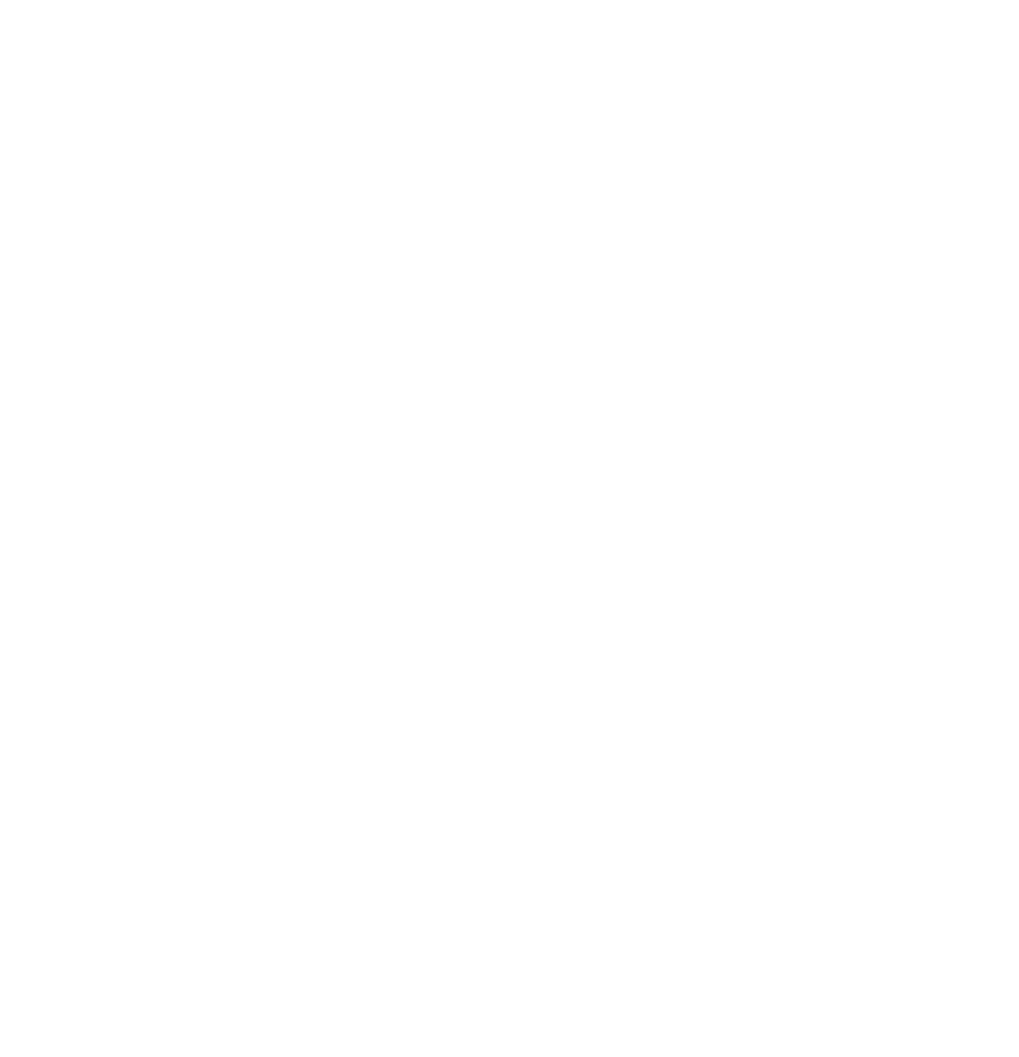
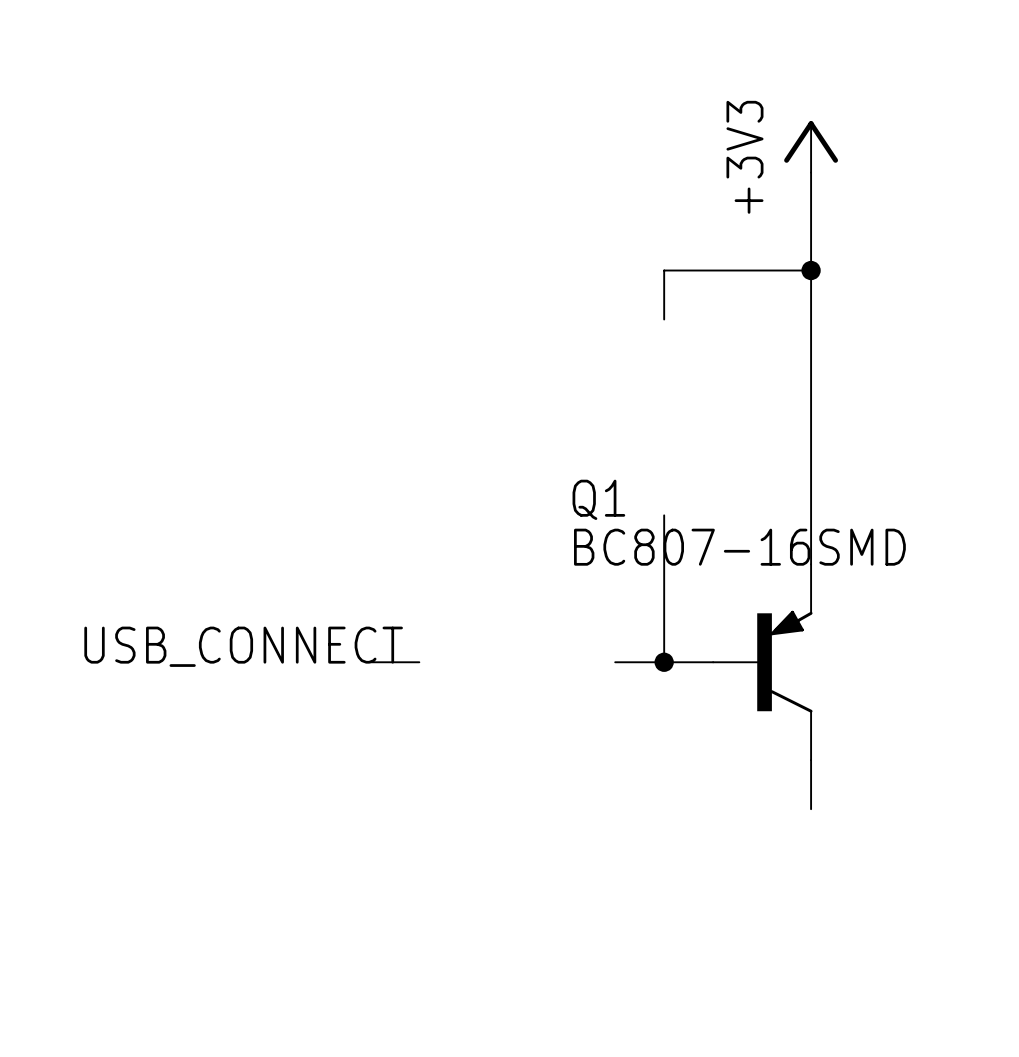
power symbol: none -> +3V3 (811, 146)
wire: none -> (811, 172) (811, 564)
wire: none -> (811, 270) (664, 270) (664, 319)
junction: none -> (811, 270)
wire: none -> (664, 515) (664, 662)
label: none -> USB_CONNECT (243, 646)
wire: none -> (370, 662) (419, 662)
wire: none -> (615, 662) (713, 662)
junction: none -> (664, 662)
Q1: none -> BC807-16SMD (762, 662)
wire: none -> (811, 760) (811, 809)

